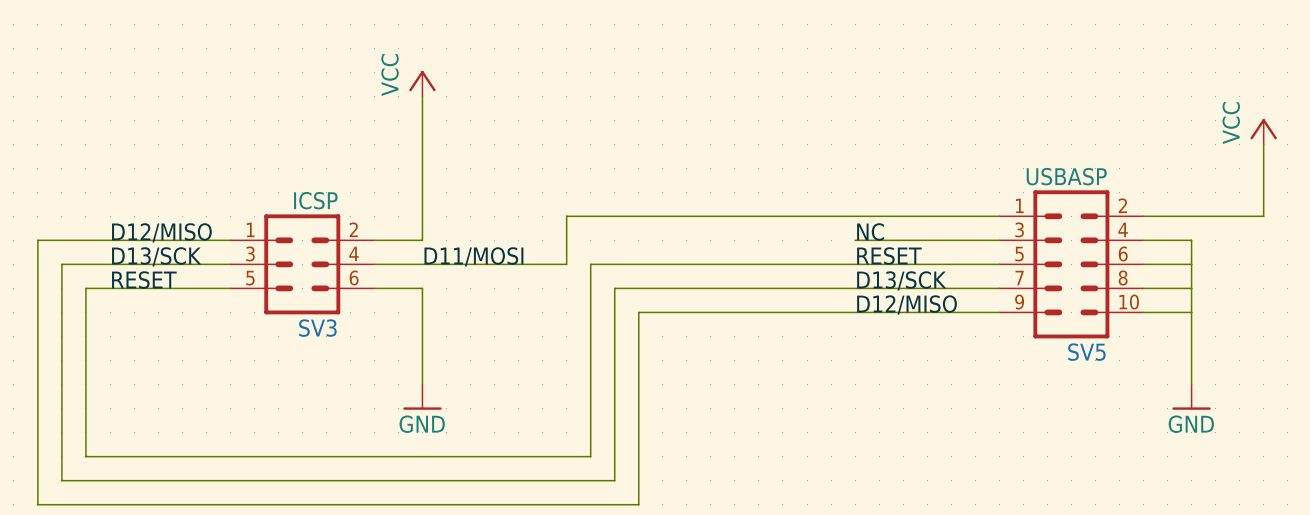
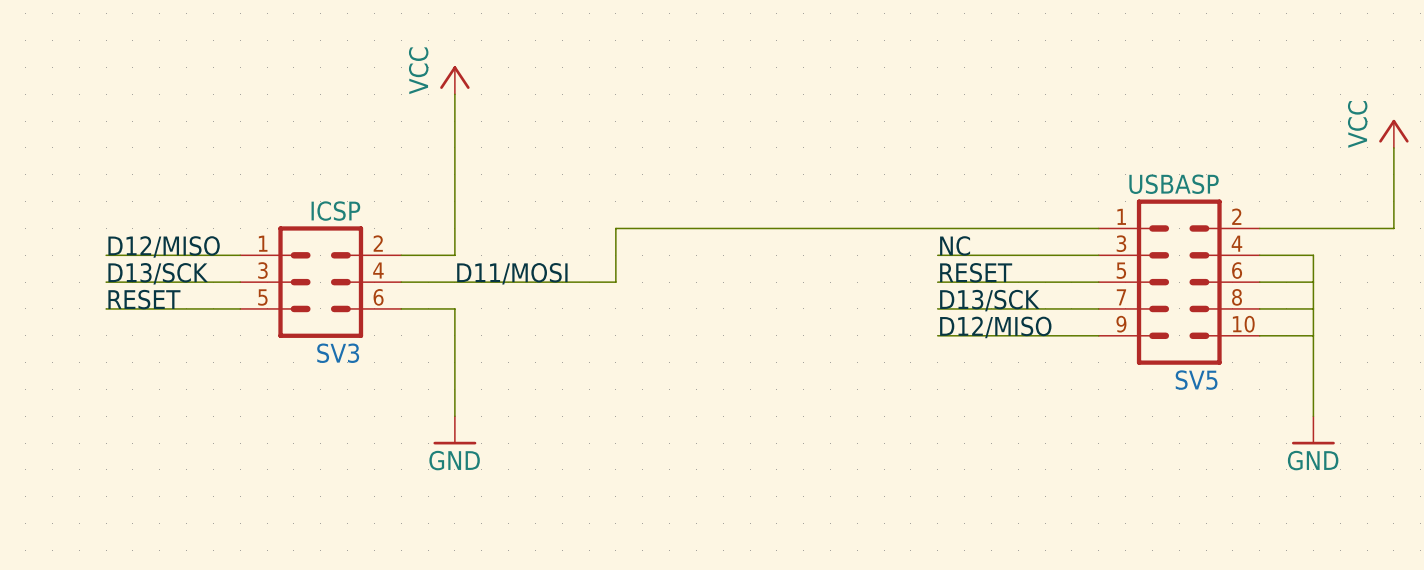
wire: (110, 240) (37, 240) (37, 504) (638, 504) (638, 312) (855, 312) -> none
wire: (110, 264) (61, 264) (61, 480) (614, 480) (614, 288) (855, 288) -> none
wire: (855, 264) (590, 264) (590, 456) (85, 456) (85, 288) (110, 288) -> none

